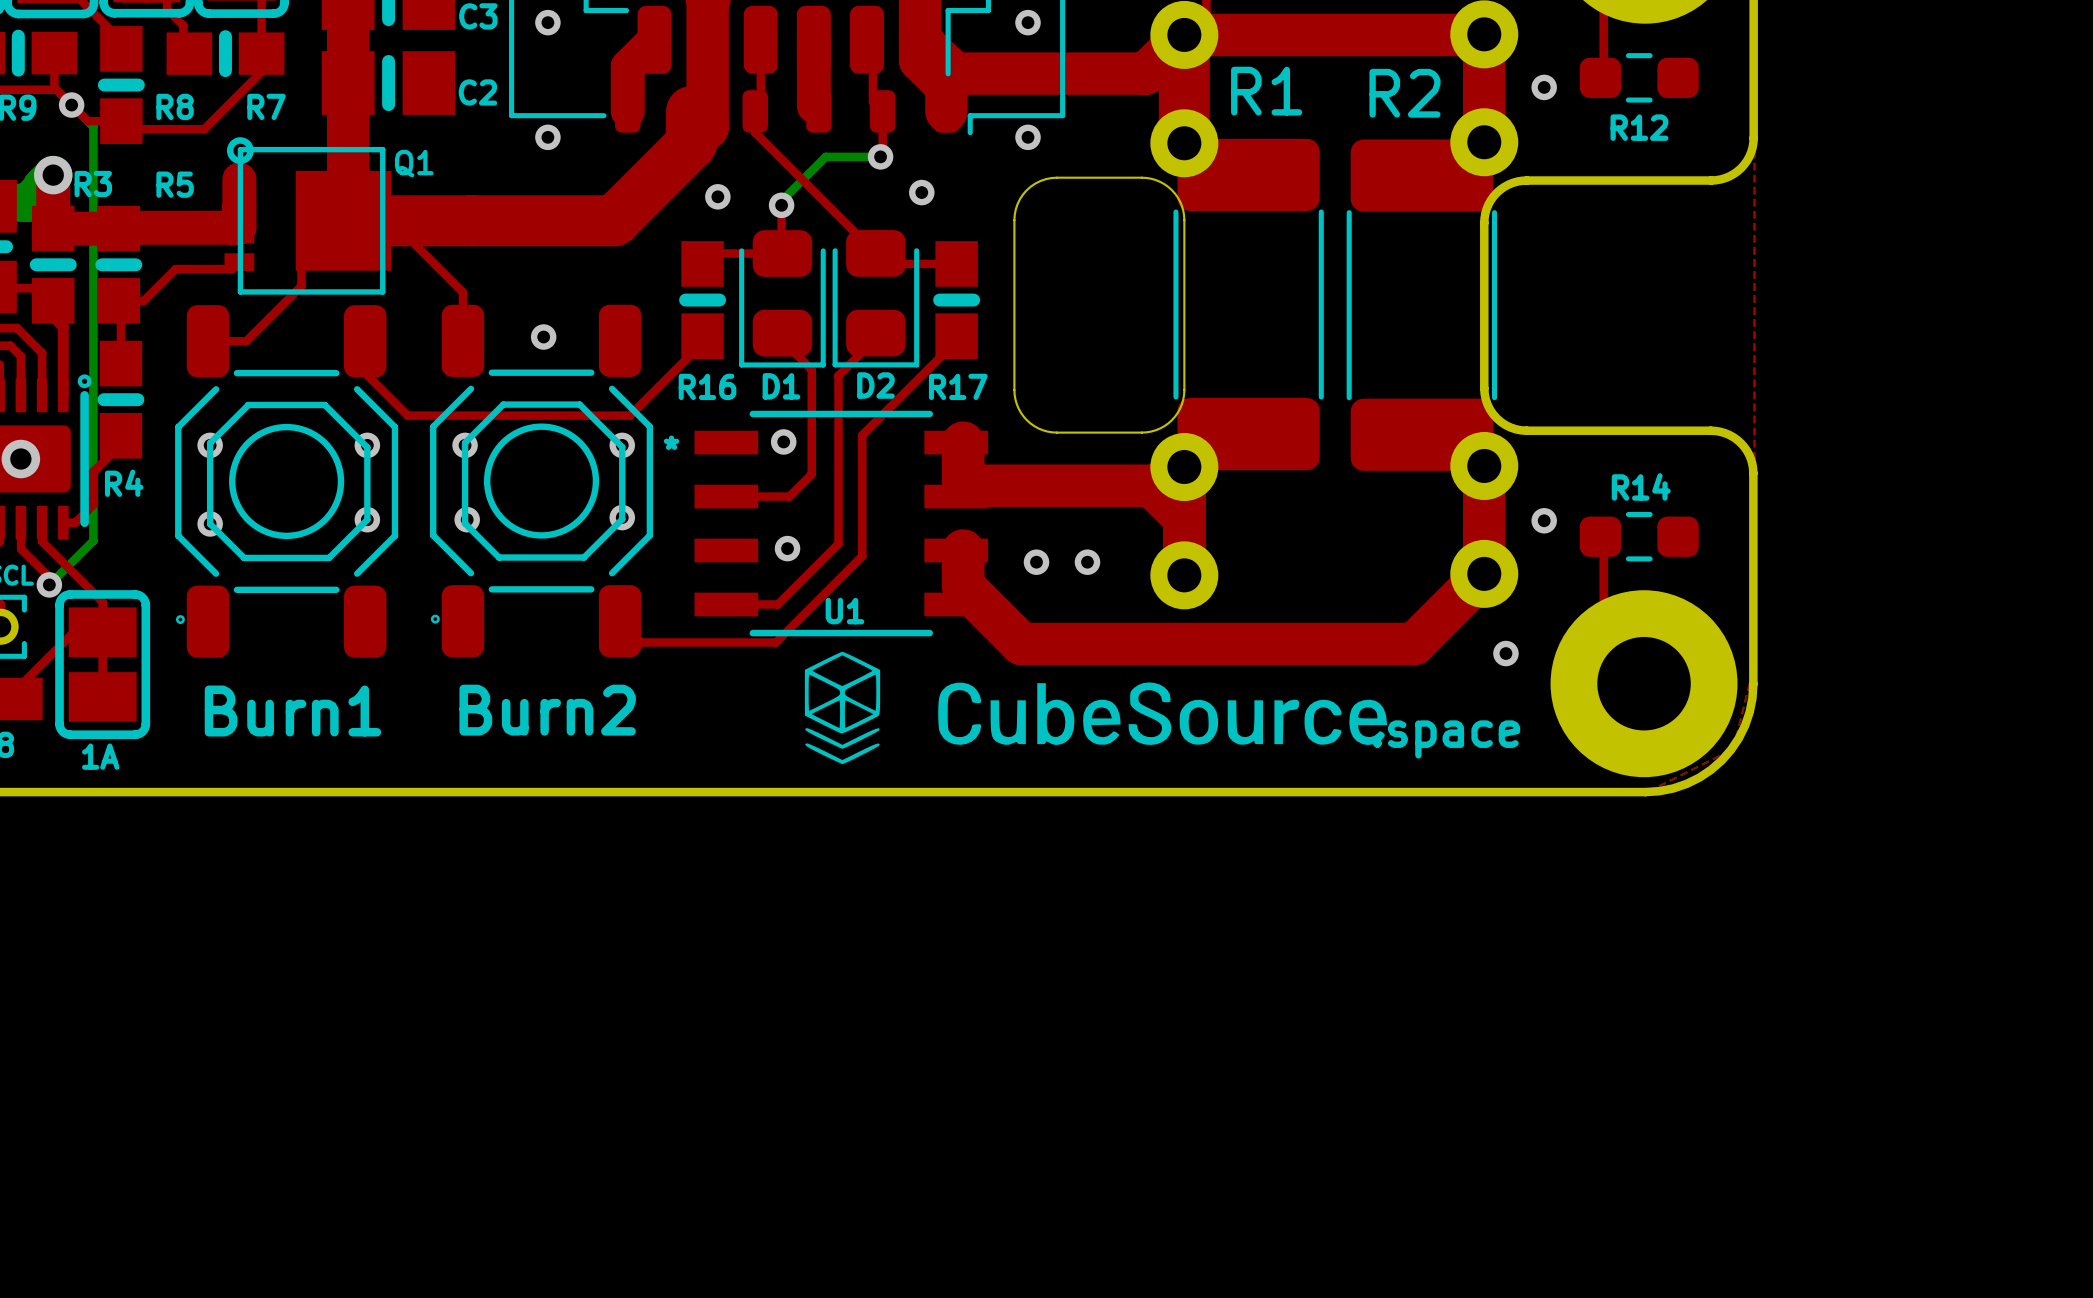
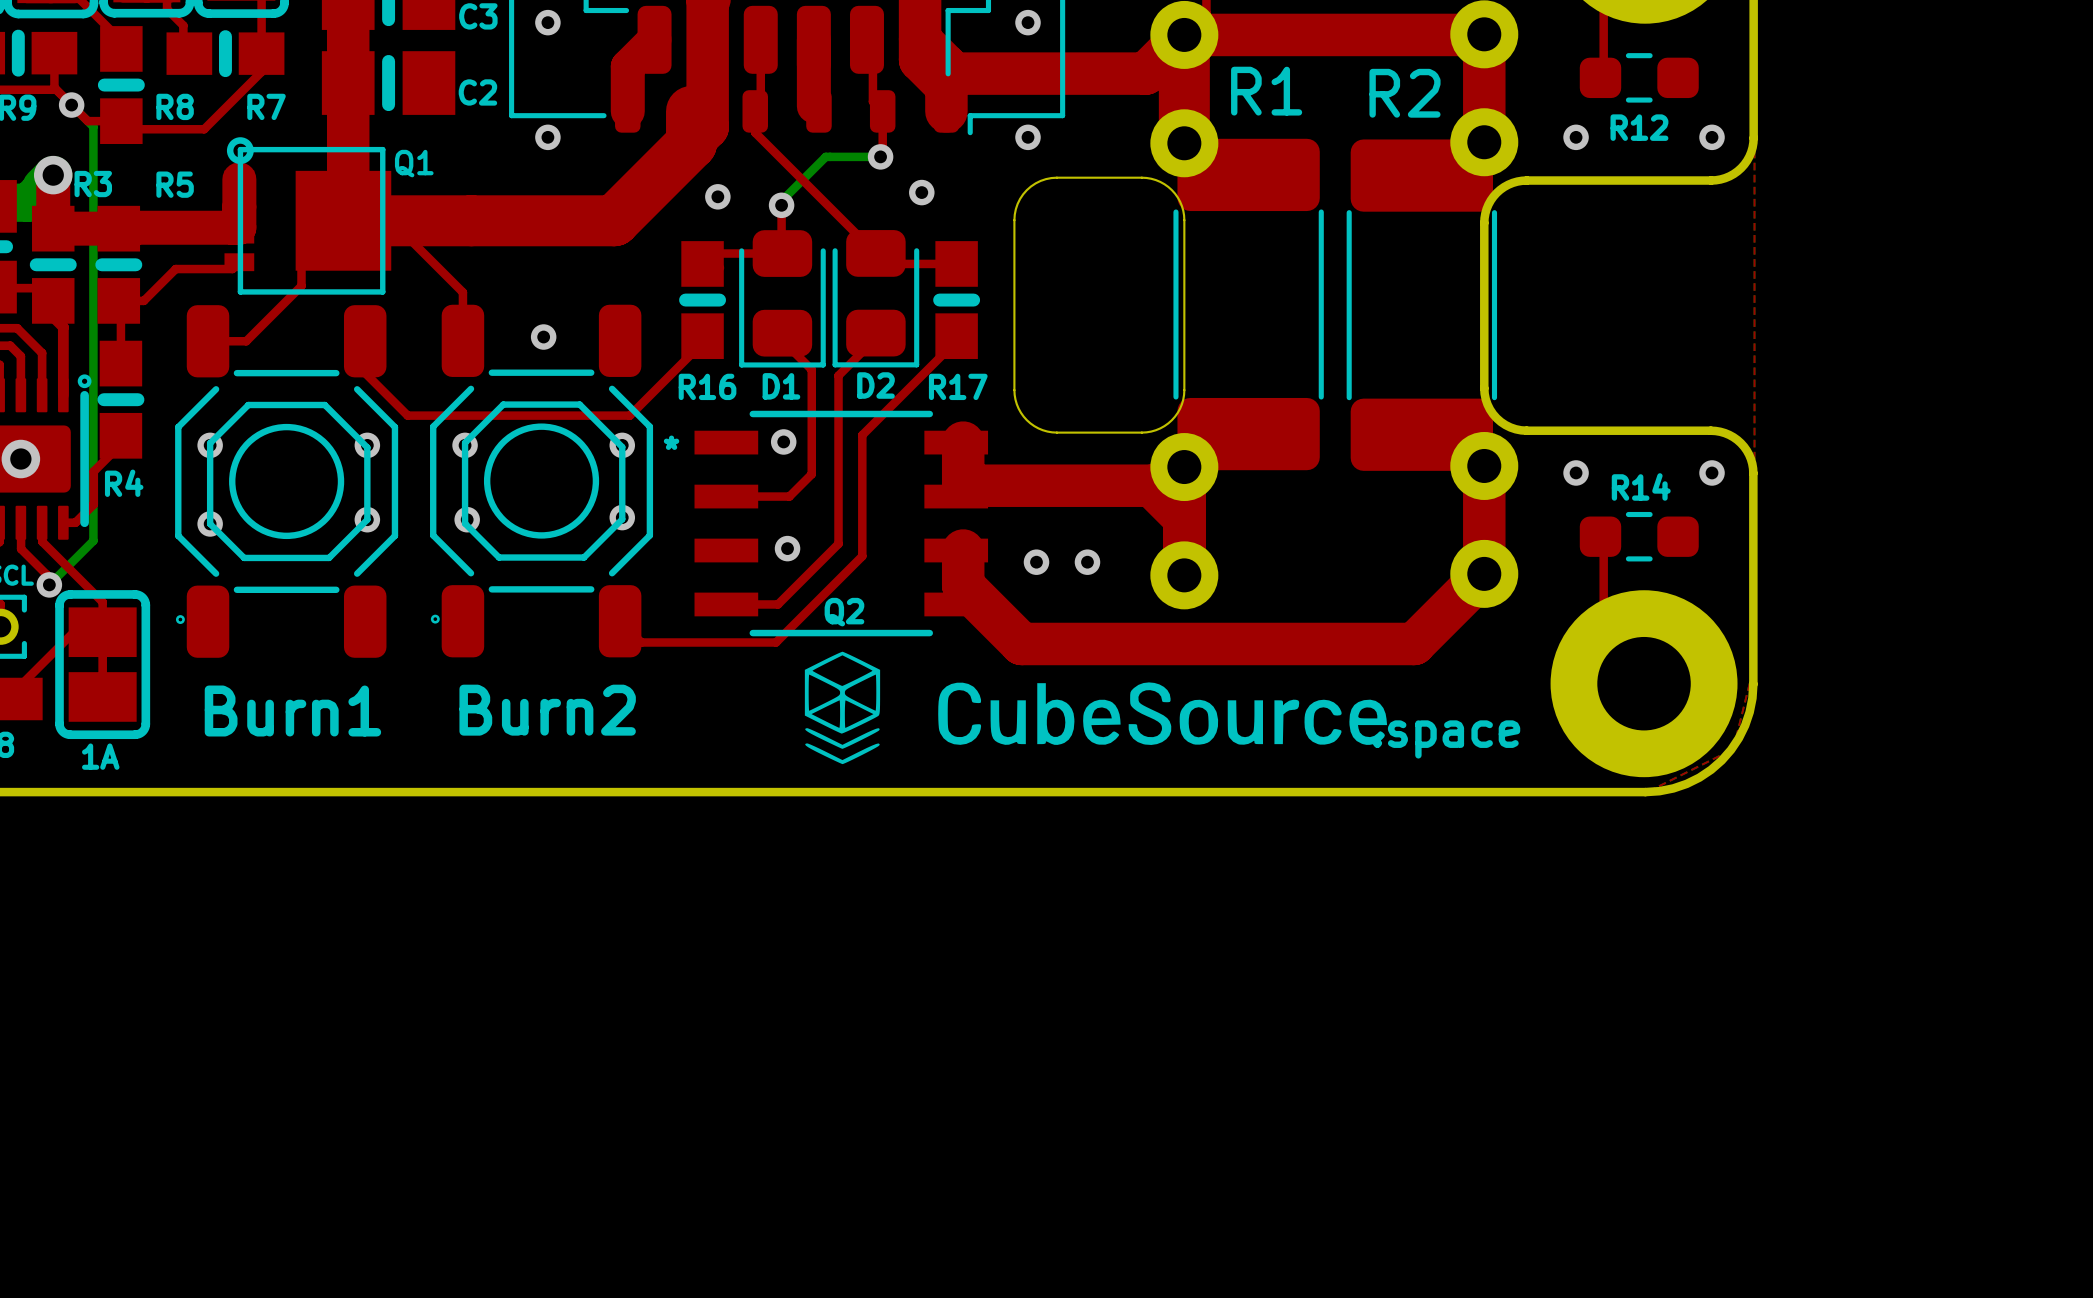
via position: (1544, 87) -> (1576, 137)
via: none -> (1712, 137)
via: none -> (1712, 472)
via position: (1544, 520) -> (1576, 472)
U1 name: U1 (844, 611) -> Q2 (844, 612)
via: (1505, 653) -> none

